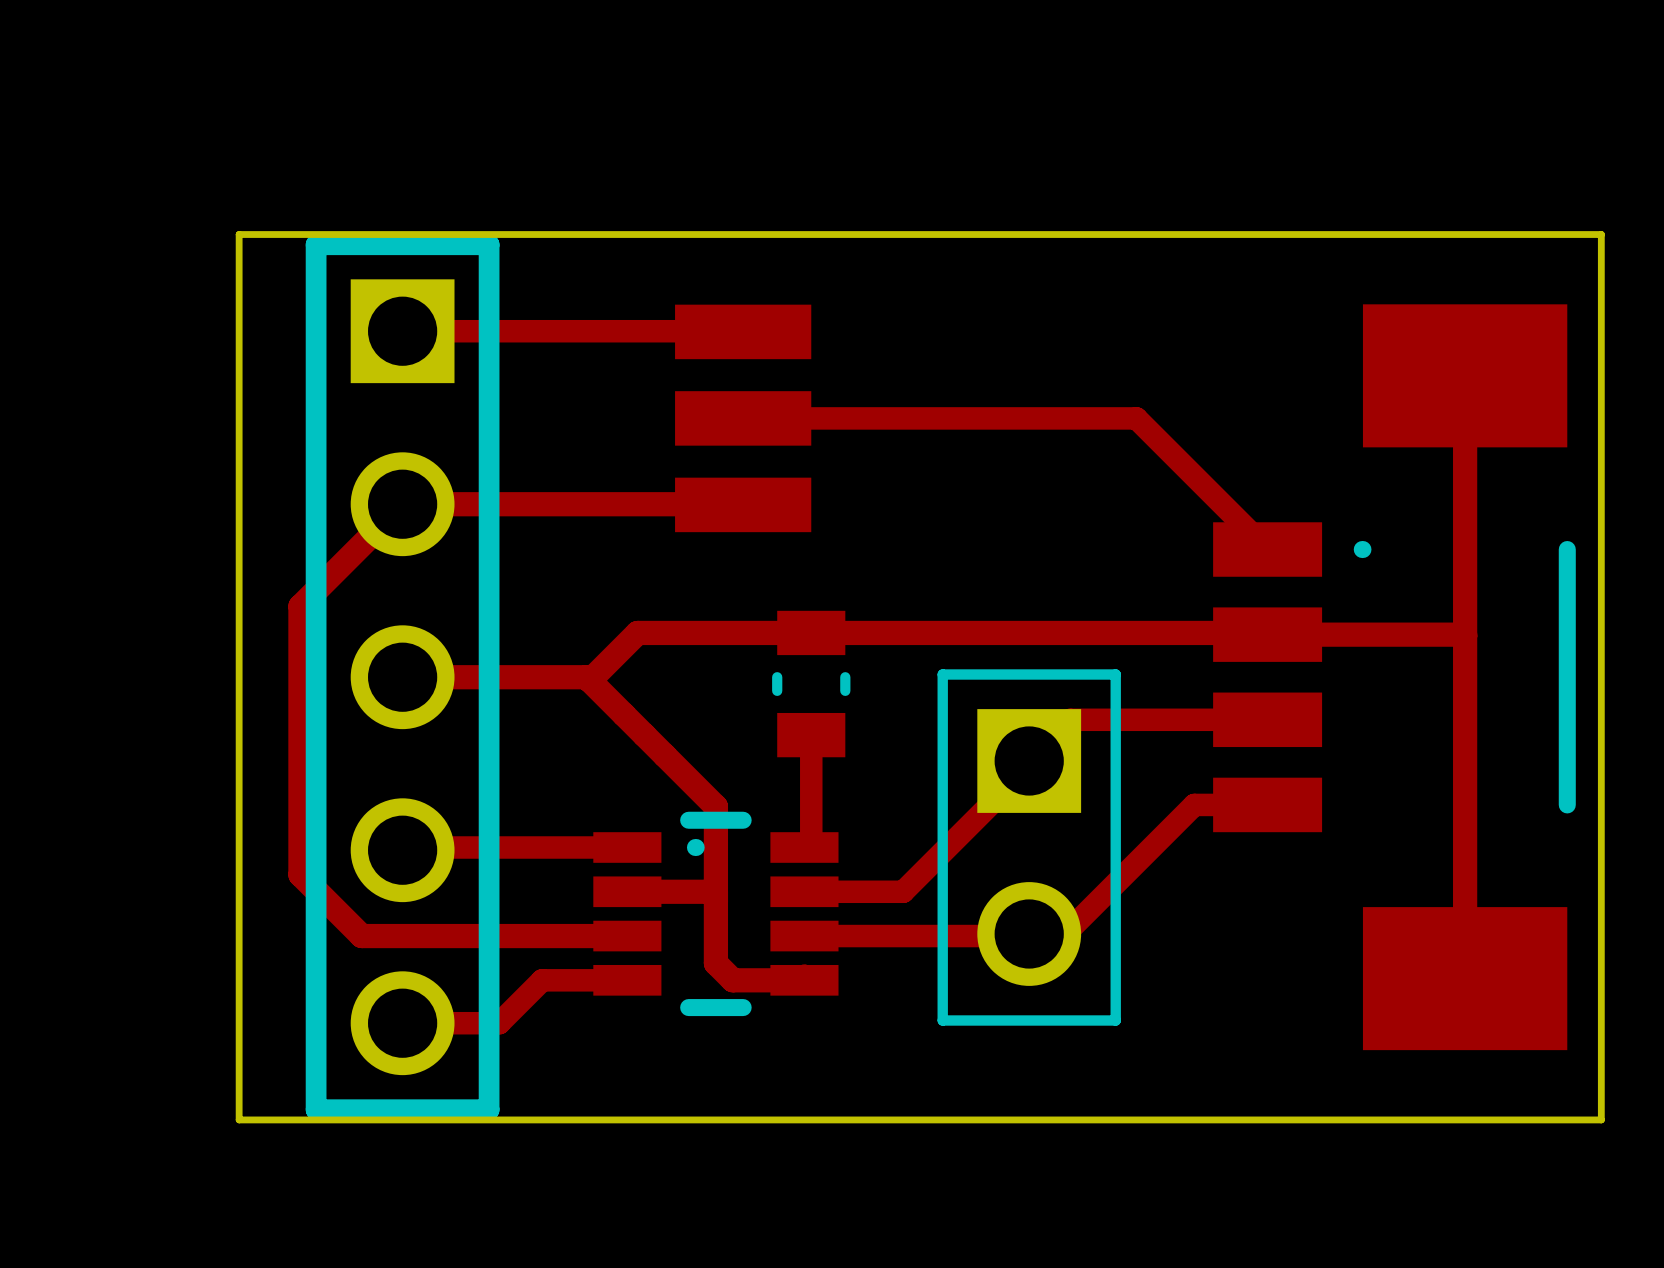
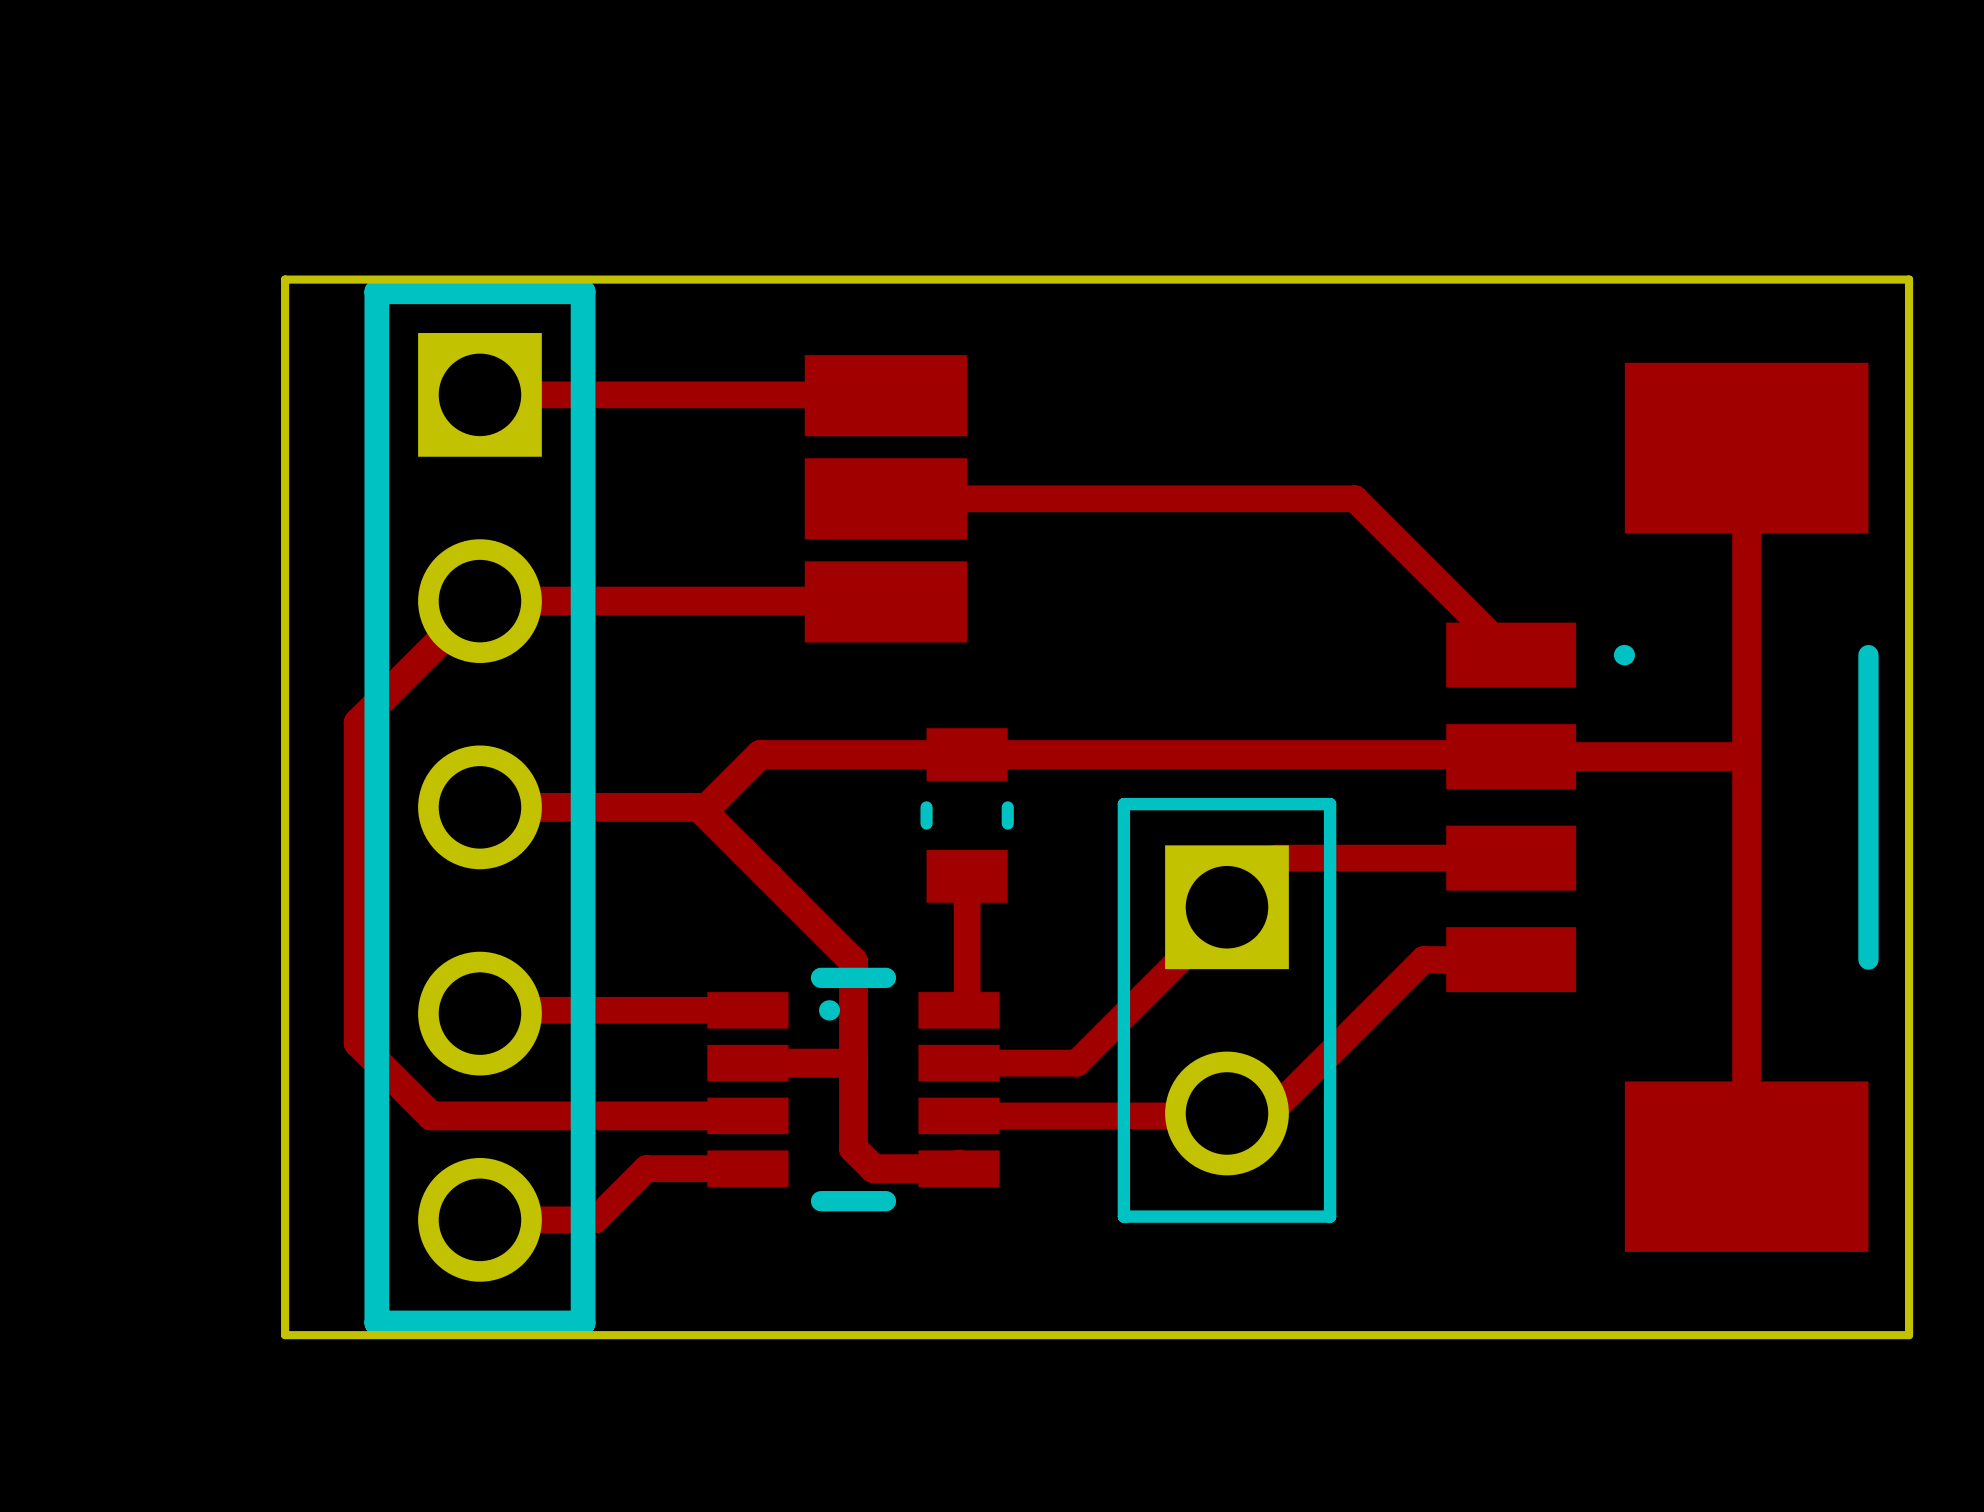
part footprint: [675, 304, 812, 533] -> [804, 355, 968, 643]

